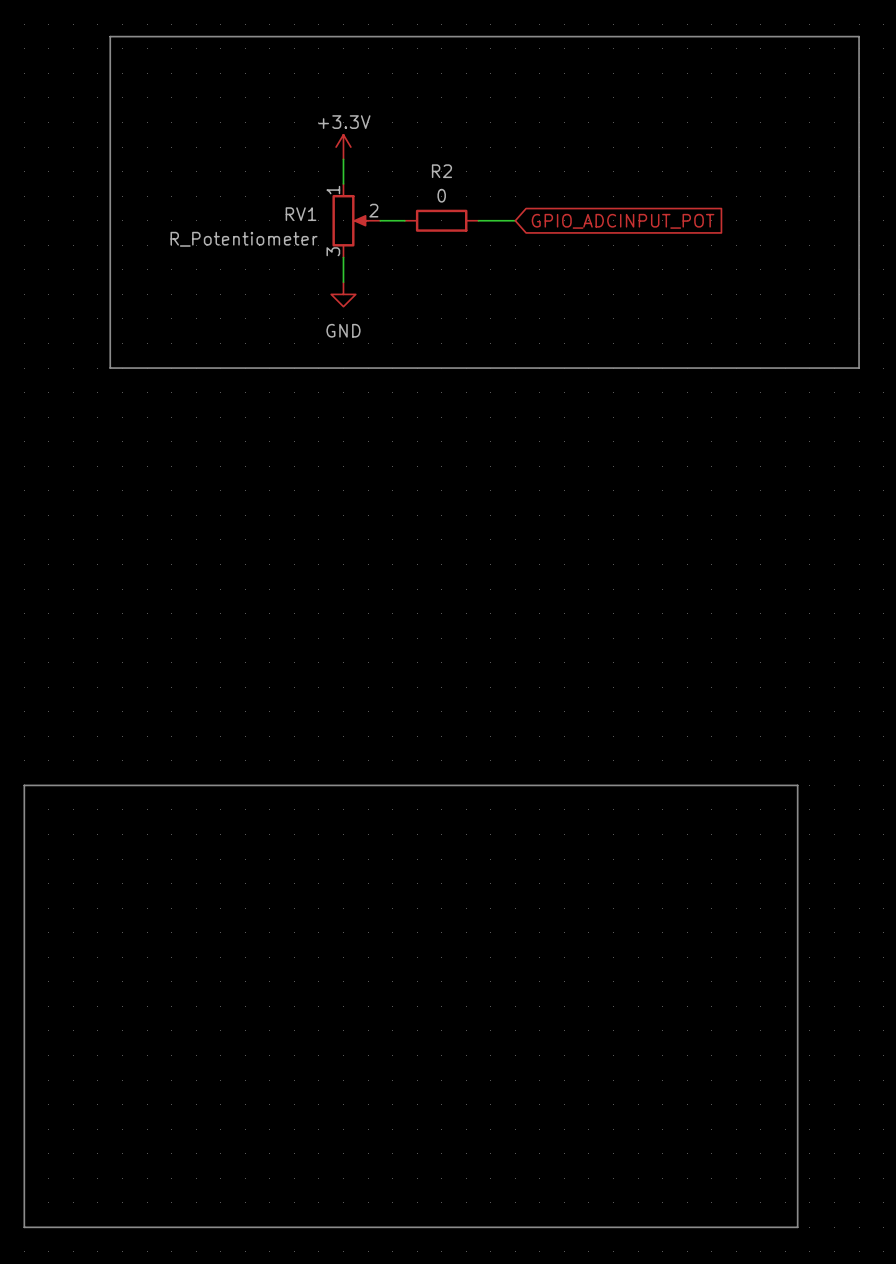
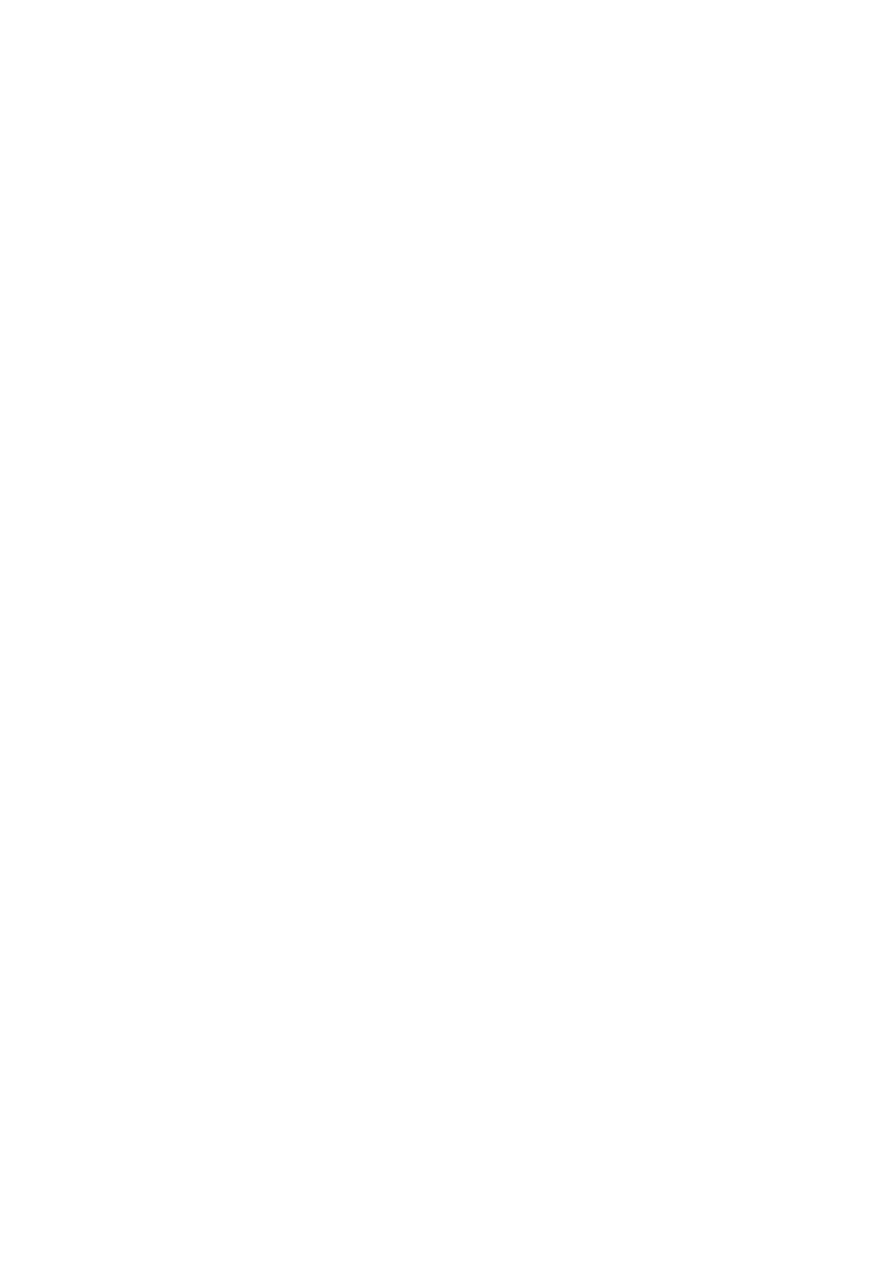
line: (110, 36) (859, 36) (859, 368) (110, 368) (110, 36) -> none
power symbol: +3.3V (343, 147) -> none
wire: (343, 159) (343, 183) -> none
RV1: R_Potentiometer (356, 220) -> none
wire: (380, 220) (404, 220) -> none
R2: 0 (441, 220) -> none
wire: (478, 220) (515, 220) -> none
global label: GPIO_ADCINPUT_POT (623, 221) -> none
wire: (343, 257) (343, 282) -> none
power symbol: GND (343, 294) -> none
line: (24, 785) (797, 785) (797, 1227) (24, 1227) (24, 785) -> none

